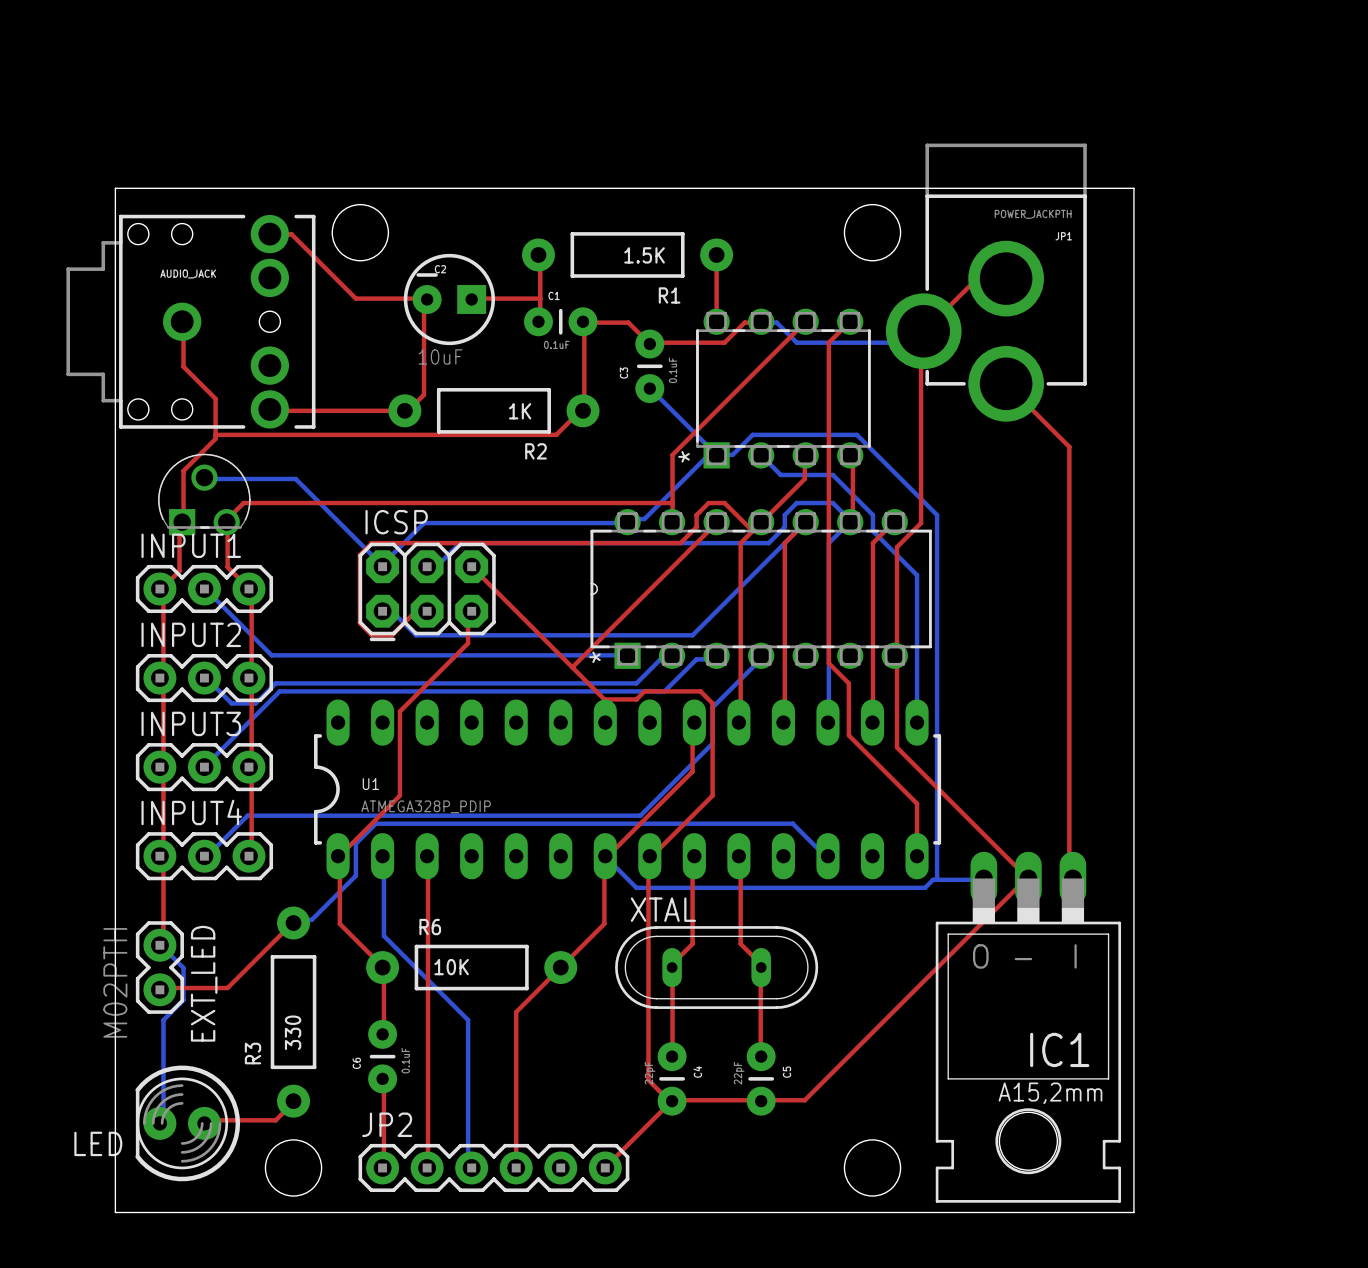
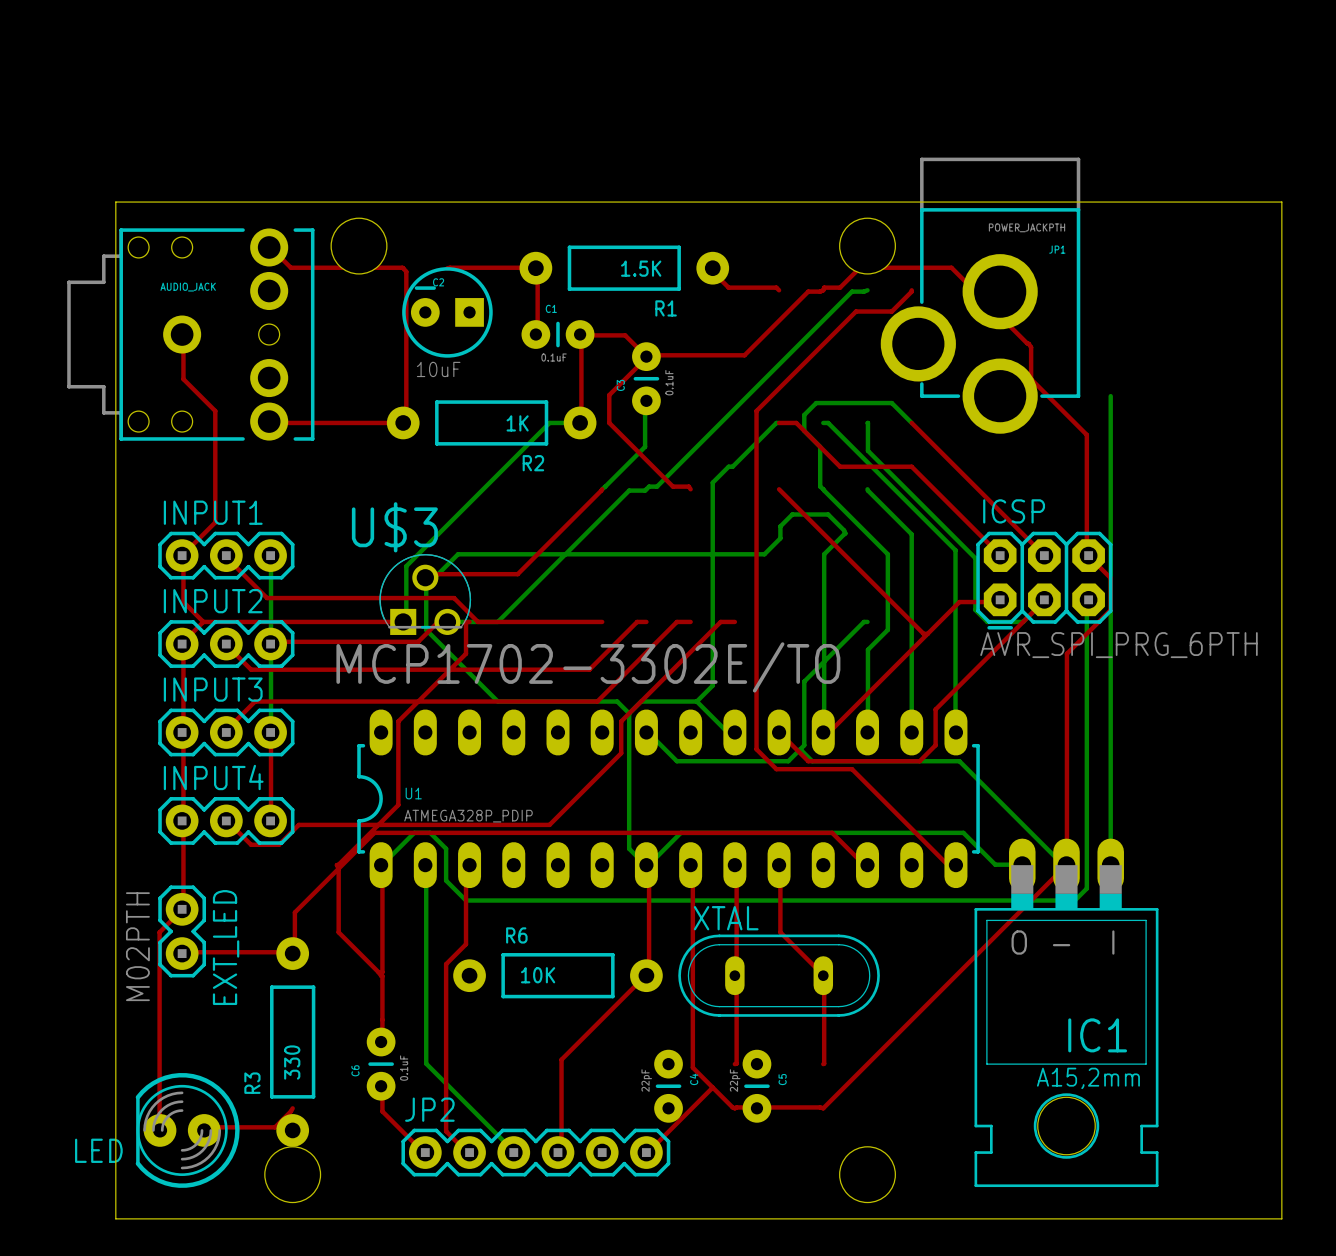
board edge: (1133, 188) (1133, 1212) -> (1127, 202) (1281, 202) (1281, 1218) (1127, 1218)
top track: (271, 234) (291, 234) (355, 298) (427, 299) (424, 302) (424, 394) (407, 410) -> (271, 247) (290, 267) (402, 267) (406, 271) (406, 422)
top track: none -> (447, 268) (535, 268)
top track: (716, 258) (716, 321) -> (712, 271) (728, 287) (776, 287) (779, 290)
bottom track: none -> (867, 290) (852, 291) (657, 486) (649, 486) (645, 490) (629, 490) (497, 621) (447, 621)
top track: none -> (911, 290) (891, 311) (856, 311) (756, 411) (756, 749) (776, 769) (852, 769) (947, 864) (955, 865)
top track: (1006, 278) (1005, 282) (973, 282) (921, 334) (921, 523) (897, 547) (897, 655) (894, 655) (897, 659) (897, 747) (1028, 878) (804, 1100) -> (720, 355) (744, 355) (808, 291) (820, 291) (824, 287) (840, 287) (860, 267) (951, 267) (1028, 343) (1031, 347) (1031, 379) (1086, 434) (1086, 554) (1110, 578) (1110, 610) (1066, 653) (1066, 864) (823, 1108) (800, 1107)
top track: (540, 298) (471, 299) -> none
top track: (761, 321) (744, 322) (724, 342) -> none
bottom track: (761, 321) (776, 322) (796, 342) (913, 342) (923, 331) -> none
top track: (805, 321) (672, 454) (672, 522) -> none
top track: (850, 321) (828, 342) (828, 663) (848, 683) (848, 735) (917, 803) (917, 856) -> none
top track: none -> (646, 356) (609, 395) (609, 422) (672, 486) (688, 486) (690, 489)
top track: (1006, 383) (1069, 446) (1069, 875) (1072, 878) -> none
bottom track: none -> (1110, 396) (1110, 865)
bottom track: (649, 388) (716, 454) -> (646, 400) (645, 446) (602, 489)
part: (783, 388) -> none
top track: (583, 410) (580, 410) (556, 434) (215, 434) -> none
bottom track: none -> (580, 422) (549, 422) (406, 566) (406, 621) (403, 621)
top track: none -> (779, 422) (796, 422) (840, 466) (911, 466) (1000, 555)
bottom track: none -> (779, 422) (776, 422) (732, 466) (728, 466) (712, 482) (712, 666)
bottom track: none -> (867, 422) (867, 450) (975, 558) (975, 610) (987, 621) (1023, 621) (1044, 599)
top track: none -> (911, 422) (1044, 555)
bottom track: none -> (911, 422) (891, 403) (816, 403) (804, 415) (804, 430) (820, 446) (820, 486) (887, 554) (887, 629) (867, 649) (867, 732)
bottom track: (856, 434) (752, 434) (732, 454) (716, 454) -> (852, 446) (828, 422) (823, 422)
top track: (215, 438) (183, 470) (183, 519) (179, 523) (179, 571) (159, 588) (163, 591) (163, 675) (159, 678) (163, 679) (163, 763) (159, 767) (163, 767) (163, 855) (159, 856) (163, 859) (163, 943) (159, 945) -> (215, 450) (215, 522) (182, 555) (183, 602) (203, 621)
bottom track: (716, 454) (716, 458) (704, 458) (644, 519) (628, 519) (627, 522) (624, 523) (424, 523) (382, 566) (295, 478) (204, 477) -> none
bottom track: (761, 455) (780, 474) (832, 474) (872, 515) (872, 531) (917, 575) -> (867, 489) (911, 534) (911, 586)
top track: (805, 455) (804, 478) (761, 522) -> none
top track: (850, 455) (852, 458) (852, 519) (850, 522) -> none
top track: none -> (602, 489) (517, 574) (426, 574) (425, 577)
top track: none -> (779, 489) (923, 633) (927, 633)
part: (204, 494) -> none
top track: (672, 503) (243, 503) (226, 522) (227, 567) (251, 591) (251, 675) (248, 678) (251, 679) (251, 763) (248, 767) (251, 767) (251, 855) (248, 856) -> none
bottom track: (937, 515) (937, 879) -> (931, 526) (955, 550) (955, 732)
top track: (716, 522) (572, 667) -> none
top track: (761, 522) (740, 543) (740, 719) (738, 722) -> none
top track: (761, 522) (752, 531) (724, 503) (708, 503) (696, 515) (696, 527) (680, 543) (371, 543) (359, 555) (359, 623) (371, 635) (391, 635) (416, 611) (427, 611) -> none
top track: (805, 522) (784, 543) (783, 722) -> (1044, 599) (935, 709) (935, 745) (919, 761) (808, 761) (779, 732)
bottom track: (805, 522) (692, 635) (416, 635) (391, 611) (382, 611) -> none
top track: (894, 522) (872, 543) (872, 722) -> none
top track: none -> (226, 555) (267, 598) (454, 598) (477, 621) (602, 621)
bottom track: none -> (270, 555) (270, 732)
top track: (471, 566) (604, 699) -> none
ICSP: none -> AVR_SPI_PRG_6PTH (1044, 580)
U$3: none -> MCP1702-3302E/TO (425, 594)
bottom track: (204, 588) (271, 655) (627, 655) -> none
INPUT1 position: (204, 588) -> (226, 555)
part: (761, 588) -> none
top track: none -> (1000, 599) (999, 602) (959, 602) (832, 729) (824, 729) (823, 732)
bottom track: none -> (1088, 599) (1086, 602) (1086, 888) (1074, 900) (466, 900) (446, 880) (446, 848) (430, 832)
ICSP: (427, 591) -> none
top track: none -> (203, 621) (182, 644) (183, 908) (159, 932) (160, 1130)
top track: none -> (203, 621) (403, 621)
top track: none -> (447, 621) (438, 621) (418, 641) (271, 641) (270, 644)
top track: none -> (646, 621) (637, 621) (589, 669) (251, 669) (226, 644)
top track: none -> (690, 621) (676, 621) (597, 701) (255, 701) (226, 732)
bottom track: none -> (867, 621) (863, 621) (804, 681) (804, 745) (788, 761) (676, 761) (646, 732)
bottom track: (672, 655) (668, 659) (660, 659) (636, 683) (275, 683) (255, 703) (231, 703) (204, 678) -> none
bottom track: (761, 655) (760, 659) (712, 707) (712, 743) (640, 815) (247, 815) (207, 855) (204, 856) -> none
bottom track: (716, 659) (696, 659) (664, 691) -> (696, 701) (661, 701)
bottom track: none -> (712, 669) (712, 685) (696, 701)
INPUT2 position: (204, 678) -> (226, 644)
bottom track: (500, 691) (279, 691) (204, 767) -> (497, 701) (426, 629) (425, 577)
bottom track: (620, 691) (644, 691) -> (617, 701) (629, 713)
top track: (644, 691) (700, 691) (712, 703) (712, 795) (652, 855) (649, 856) (648, 859) (648, 1080) (668, 1100) (672, 1101) -> (641, 701) (720, 621) (734, 621)
bottom track: none -> (696, 701) (724, 729) (732, 729) (734, 732)
top track: (604, 699) (636, 699) -> (226, 820) (251, 844) (278, 844) (298, 824) (549, 824) (621, 753) (621, 721) (633, 709)
top track: none -> (270, 732) (270, 820)
top track: (694, 722) (692, 723) (692, 771) (608, 855) (605, 856) (604, 923) (516, 1012) (516, 1167) -> none
bottom track: none -> (800, 749) (812, 761) (959, 761) (1062, 864) (1066, 865)
INPUT3 position: (204, 767) -> (226, 732)
U1 position: (627, 789) -> (668, 798)
bottom track: (416, 823) (375, 823) (355, 843) (355, 875) (311, 919) (295, 919) (293, 923) -> (414, 832) (381, 865)
bottom track: (432, 823) (684, 823) -> (629, 713) (629, 848) (645, 864) (649, 864) (680, 832)
bottom track: (792, 823) (824, 855) (827, 856) -> (788, 832) (963, 832) (995, 864) (1022, 865)
INPUT4 position: (204, 856) -> (226, 820)
top track: none -> (381, 865) (381, 975)
bottom track: (382, 856) (383, 935) (468, 1020) (468, 1164) (471, 1167) -> none
top track: (427, 856) (427, 1167) -> none
bottom track: none -> (425, 865) (426, 1063) (513, 1152)
top track: none -> (469, 865) (466, 868) (466, 944) (446, 964) (446, 1131) (469, 1152)
bottom track: (605, 856) (636, 887) (925, 887) (933, 879) (983, 878) -> none
top track: none -> (646, 865) (649, 868) (649, 972) (561, 1059) (561, 1151) (557, 1152)
top track: (694, 856) (692, 859) (692, 943) (672, 963) (672, 967) (672, 1056) -> (690, 865) (692, 868) (692, 1067) (732, 1107) (736, 1107)
top track: none -> (779, 865) (780, 932) (824, 976) (823, 1064)
top track: none -> (867, 865) (863, 864) (832, 832) (374, 832) (294, 912) (294, 952) (182, 953)
top track: (293, 923) (227, 988) (163, 988) (159, 989) -> none
top track: (740, 943) (760, 963) (761, 1056) -> (736, 952) (734, 975) (736, 976) (736, 1063) (734, 1064)
bottom track: (159, 945) (183, 967) (183, 1000) (163, 1020) (163, 1120) (159, 1123) -> none
EXT_LED position: (159, 967) -> (182, 931)
R6 position: (471, 967) -> (557, 975)
XTAL position: (716, 967) -> (779, 975)
R3 position: (293, 1012) -> (292, 1042)
IC1 position: (1028, 1027) -> (1066, 1012)
top track: none -> (712, 1087) (646, 1152)
top track: (740, 1100) (672, 1101) -> none
top track: (672, 1101) (605, 1167) -> none
top track: (383, 1104) (382, 1167) -> (382, 1111) (425, 1152)
JP2 position: (493, 1167) -> (535, 1152)

